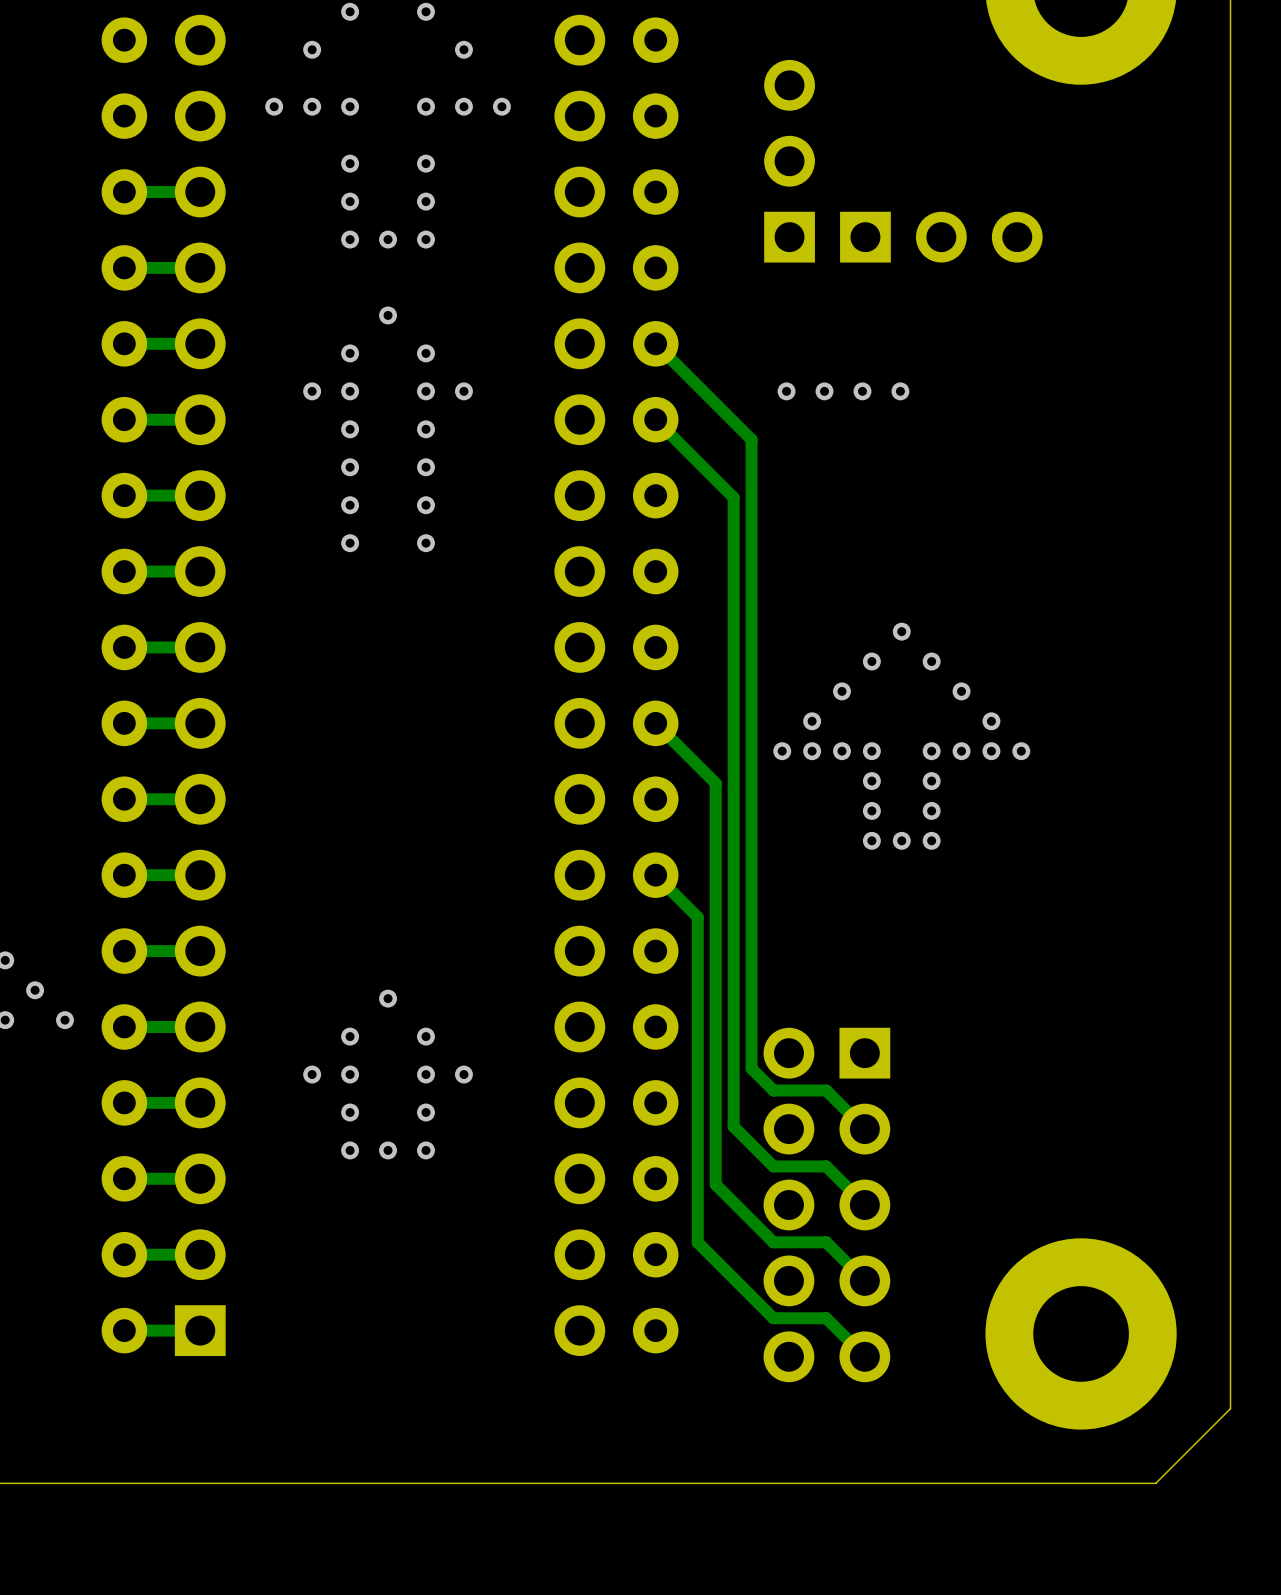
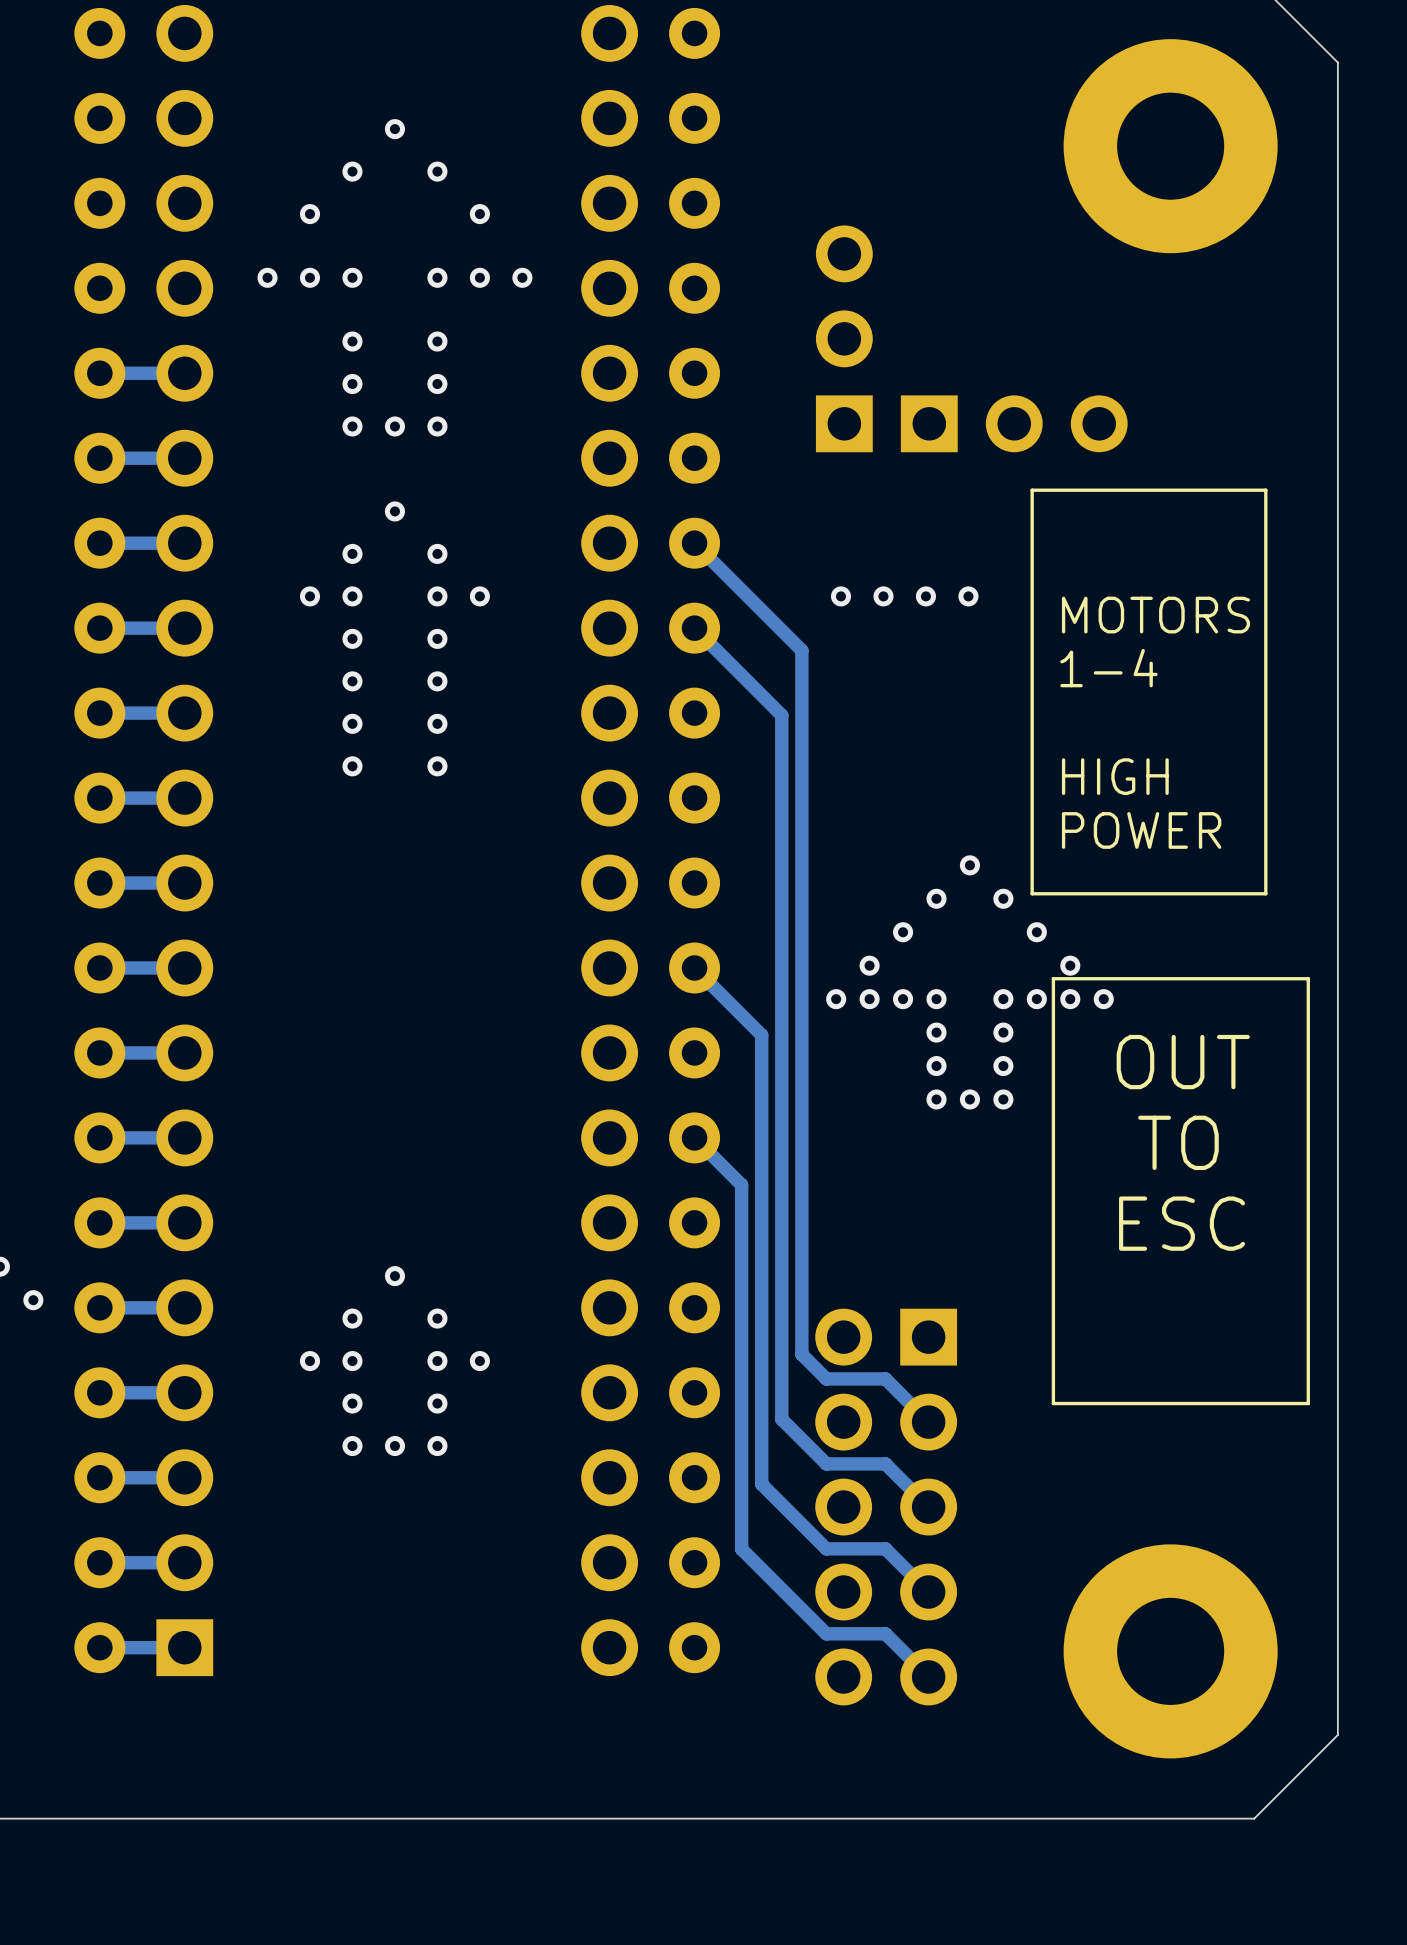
line: none -> (1265, 490) (1032, 490) (1032, 893) (1265, 893) (1265, 490)
text: none -> MOTORS (1155, 615)
text: none -> 1-4 (1108, 668)
text: none -> HIGH (1115, 776)
text: none -> POWER (1141, 830)
line: none -> (1308, 978) (1053, 978) (1053, 1403) (1308, 1403) (1308, 978)
text: none -> OUT (1183, 1062)
text: none -> TO (1178, 1142)
text: none -> ESC (1182, 1223)

